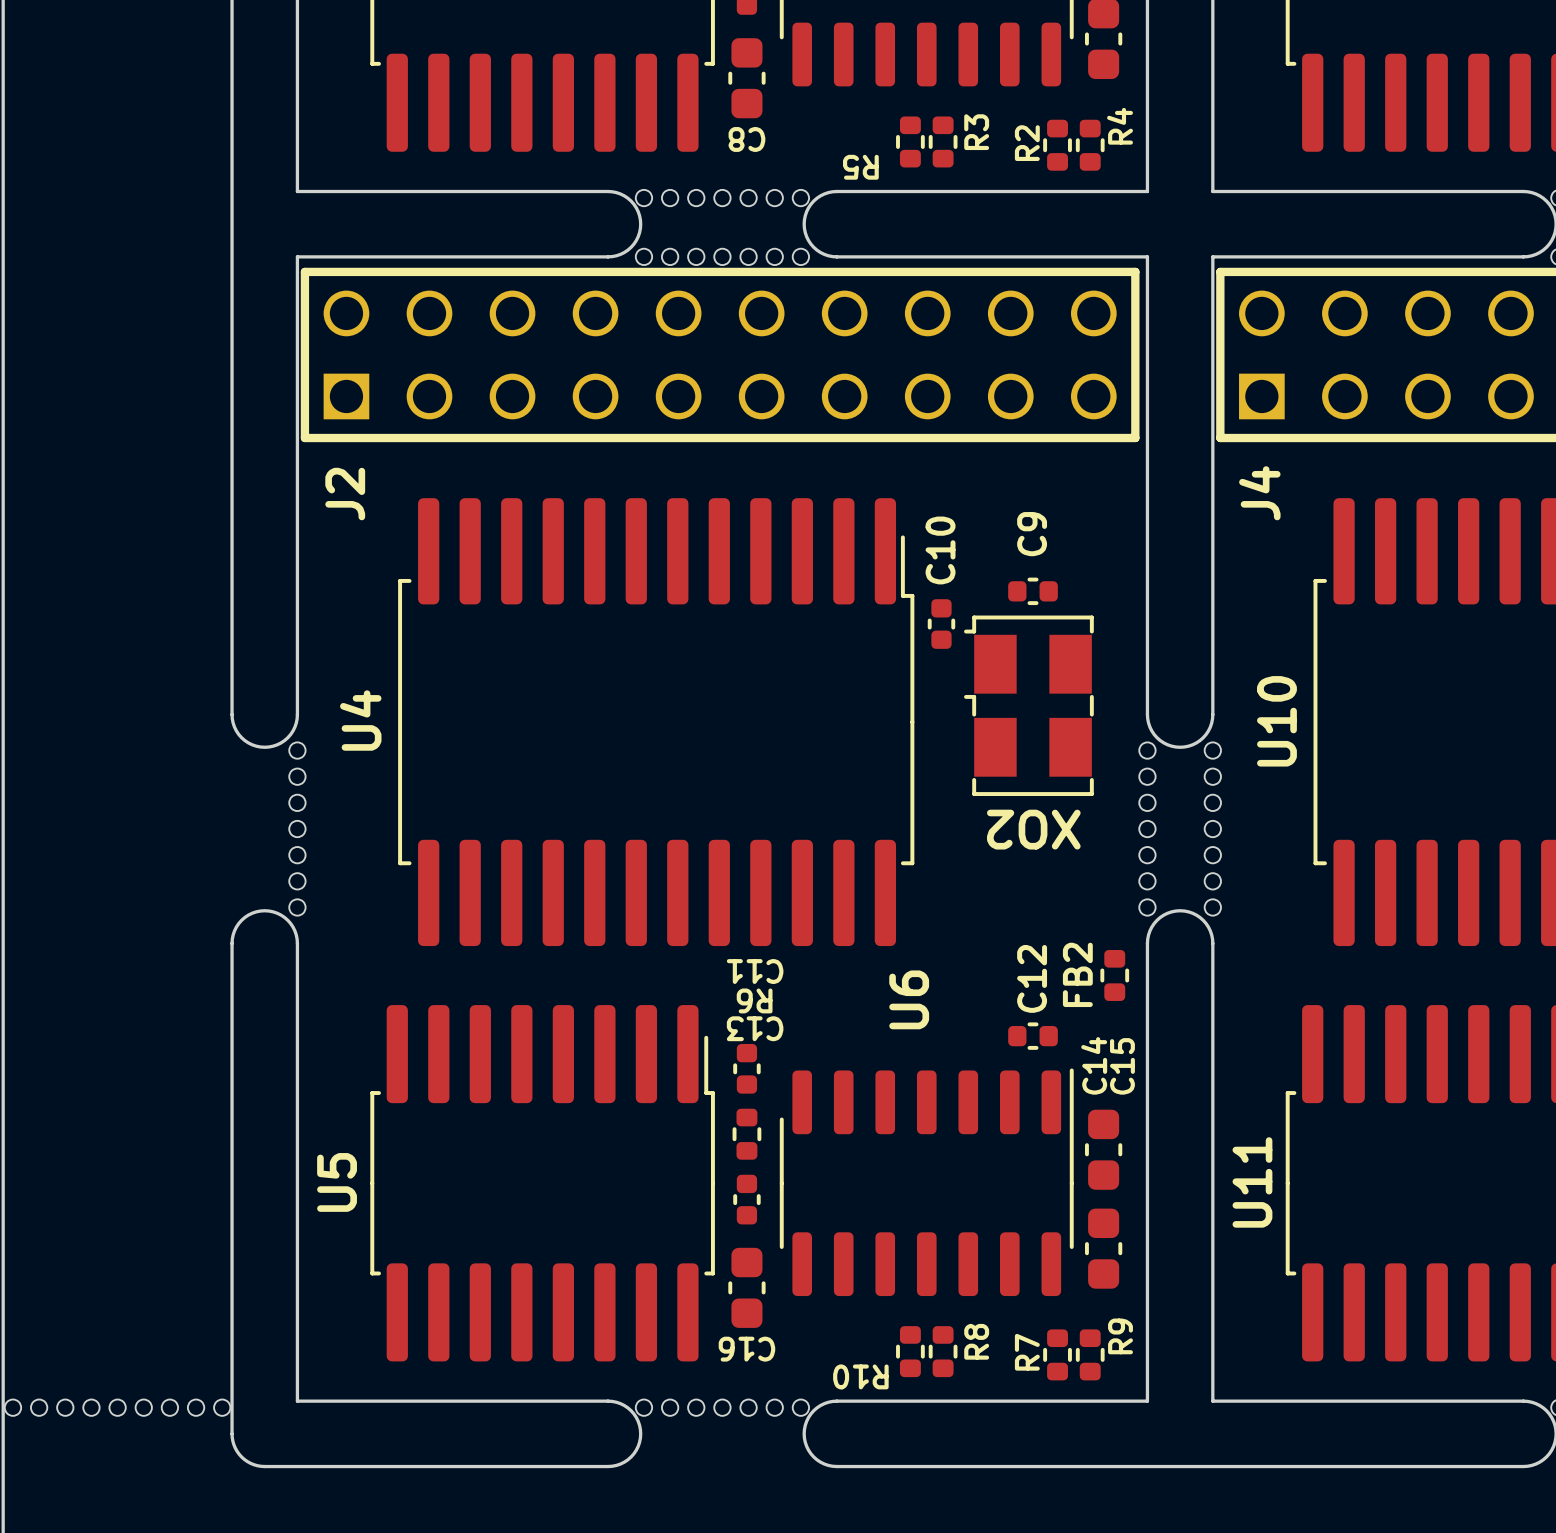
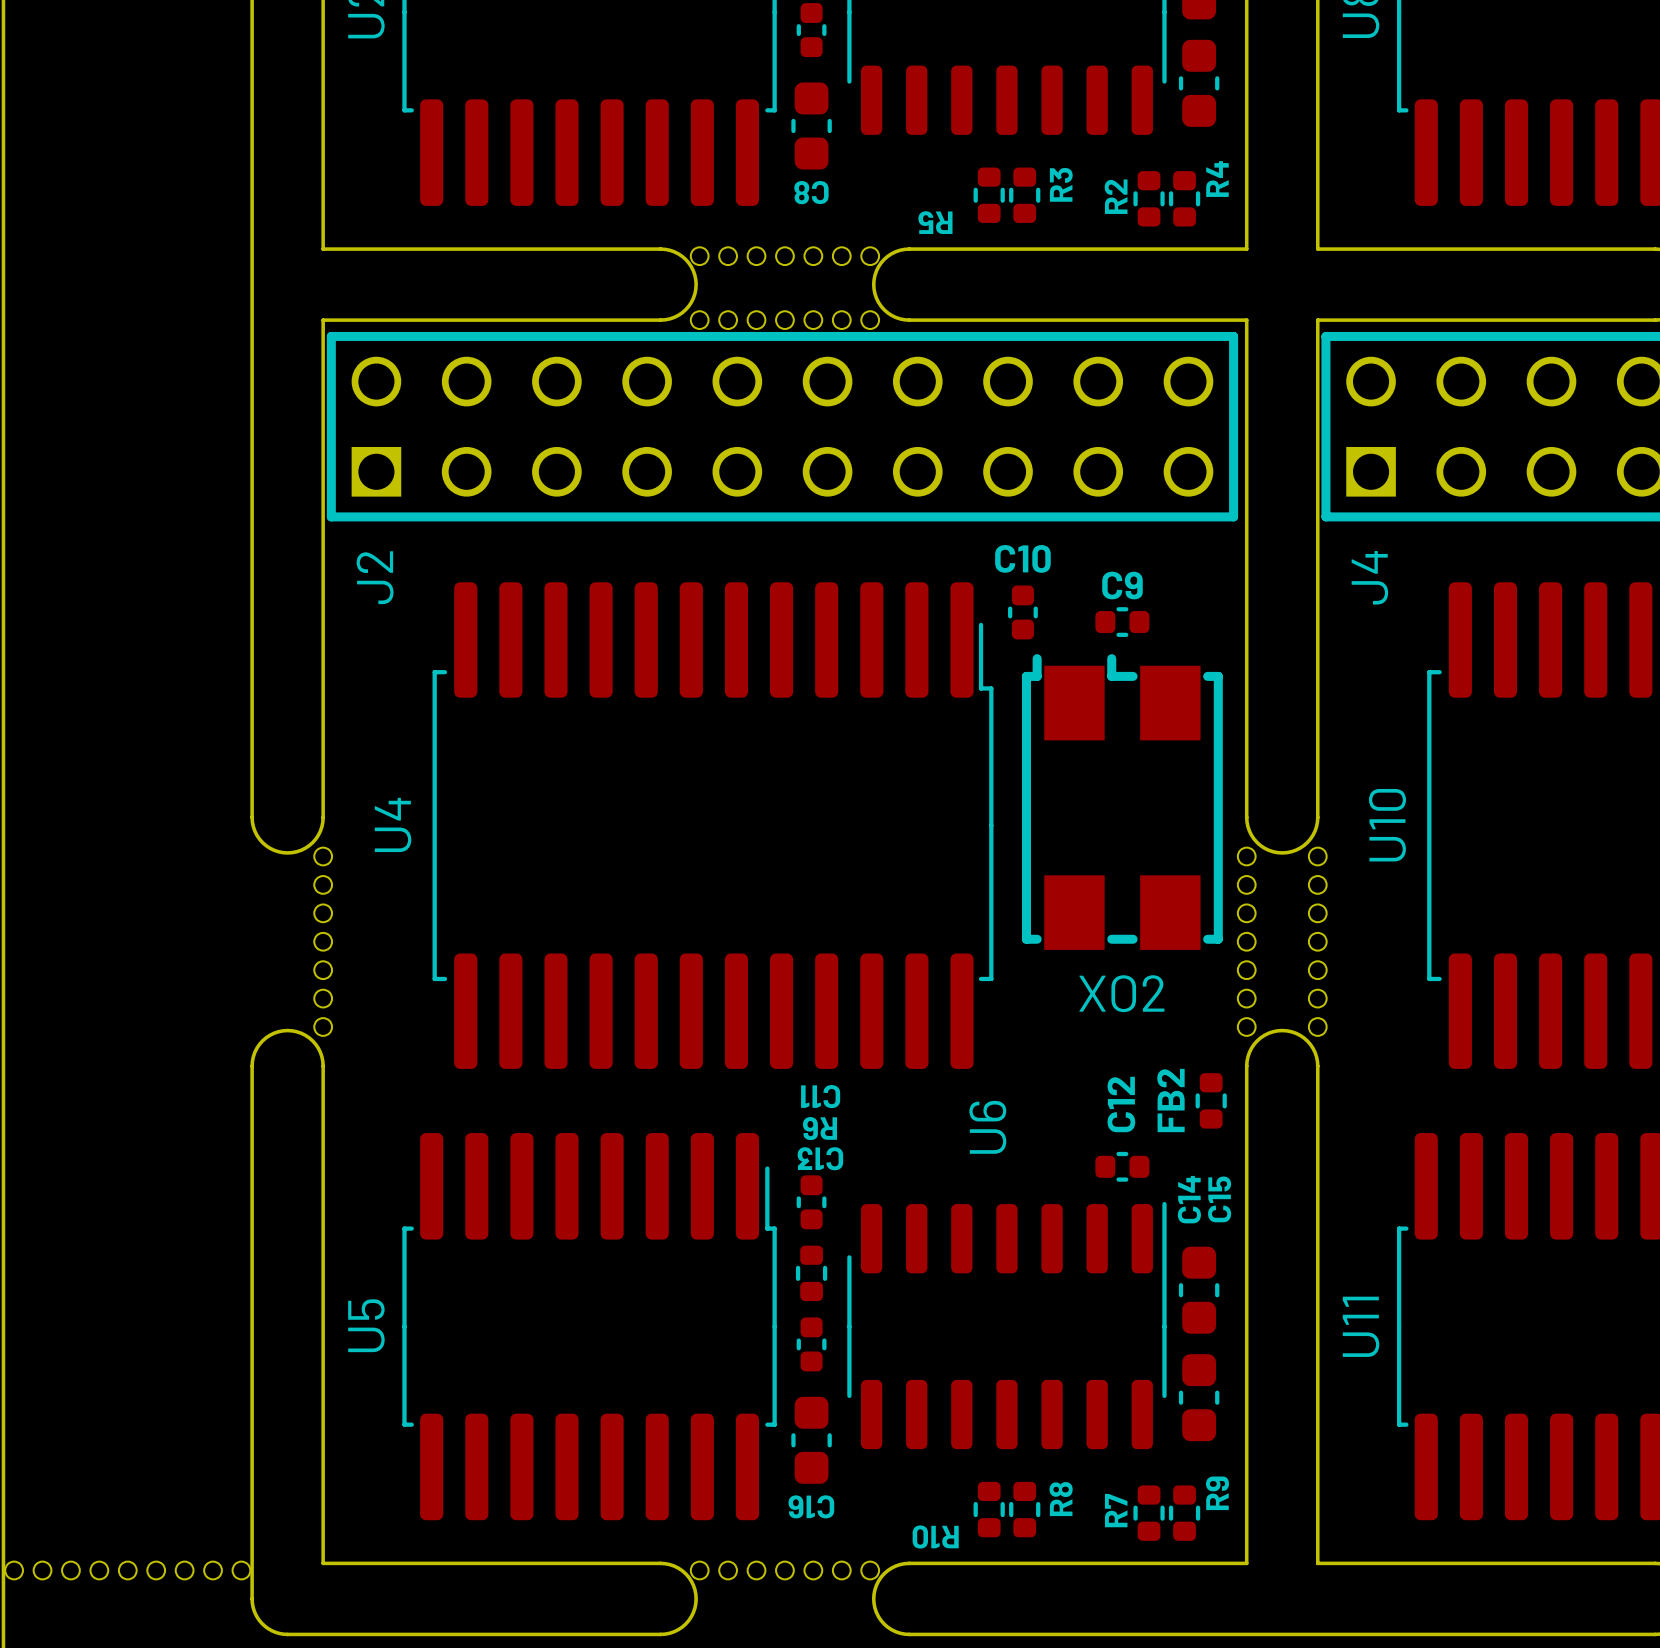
C9 name rotation: 0° (1032, 534) -> 90° clockwise (1122, 585)
C10 name rotation: 0° (940, 550) -> 90° clockwise (1022, 558)
C9 position: (1033, 591) -> (1122, 622)
XO2 footprint: [964, 615, 1094, 796] -> [1021, 654, 1223, 950]
C10 position: (941, 624) -> (1022, 612)

